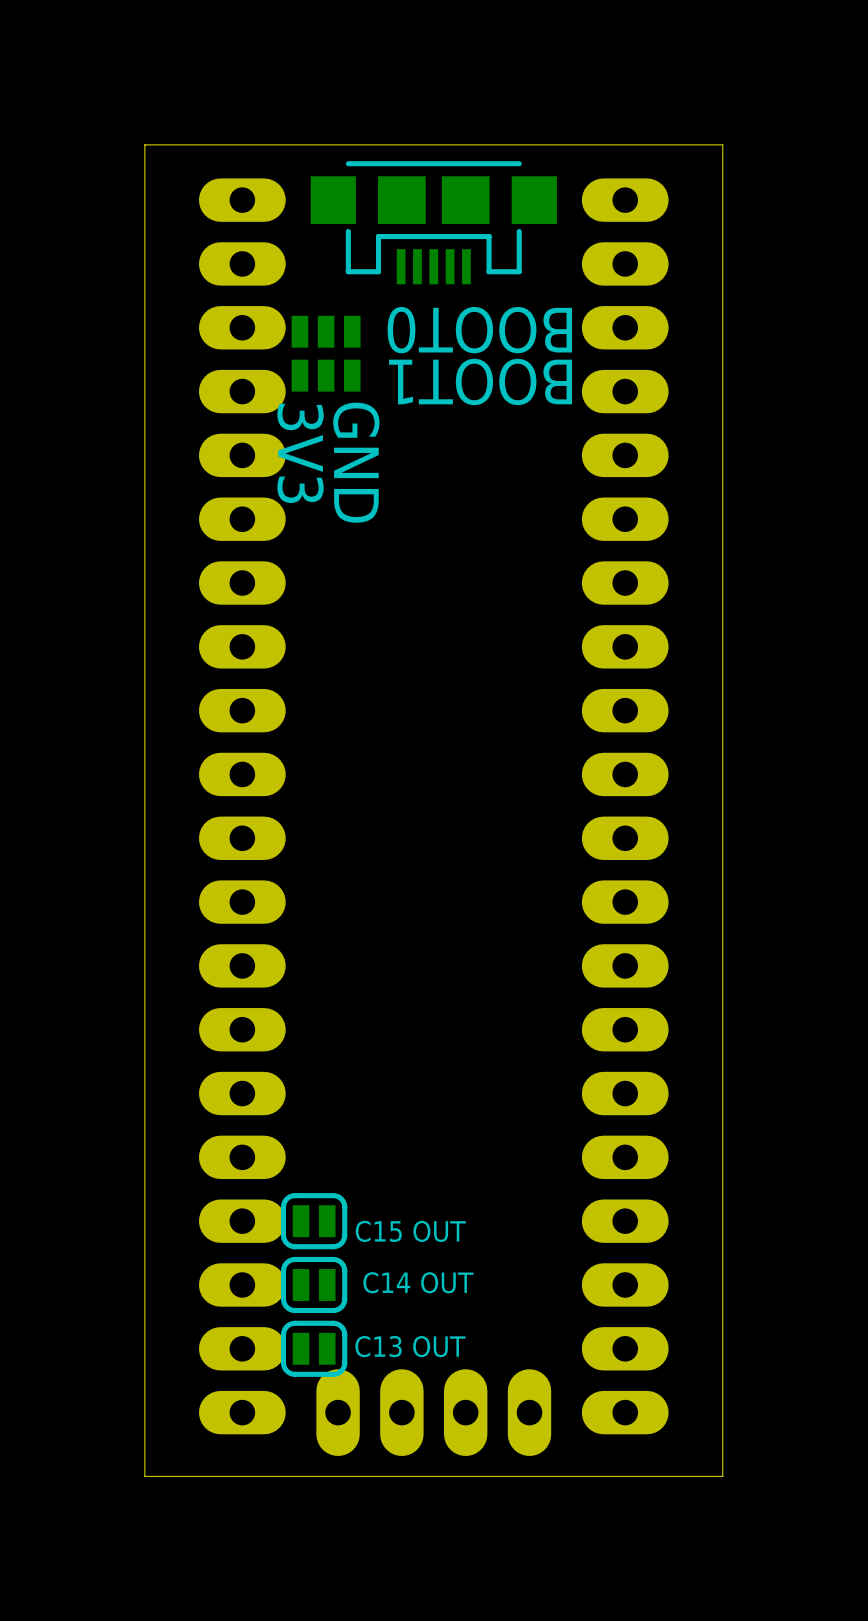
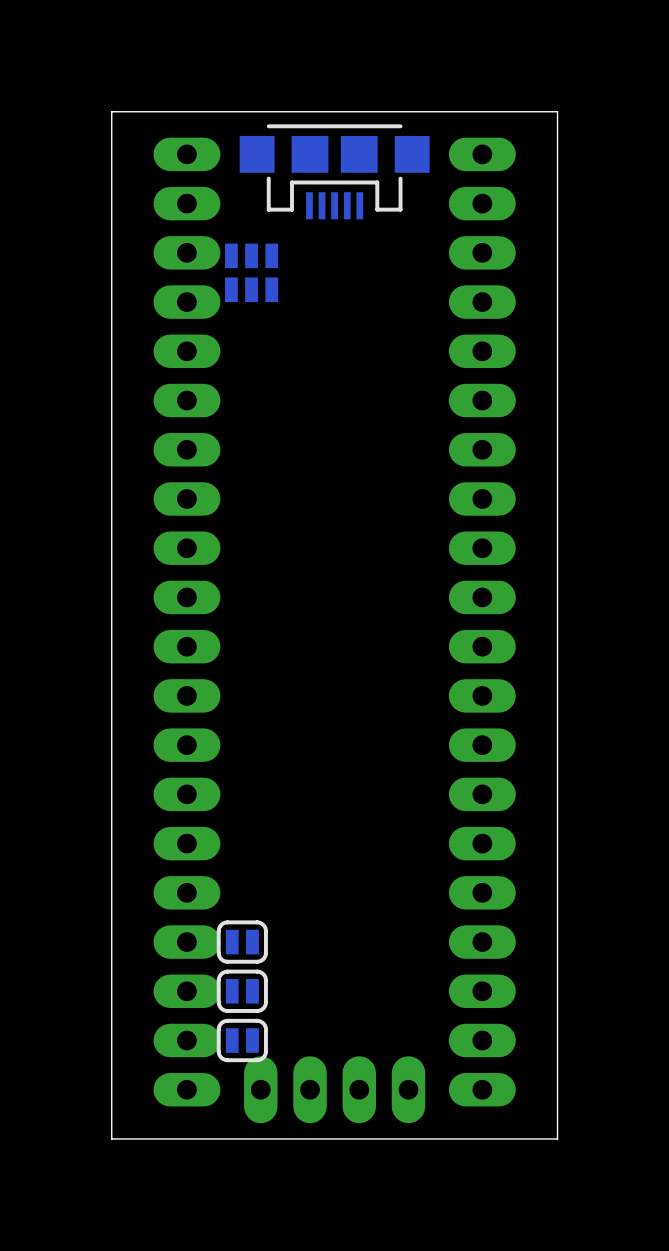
text: BOOT0 (479, 330) -> none
text: BOOT1 (480, 381) -> none
text: 3V3 (300, 453) -> none
text: GND (356, 462) -> none
text: C15 OUT (410, 1231) -> none
text: C14 OUT (418, 1282) -> none
text: C13 OUT (410, 1346) -> none

